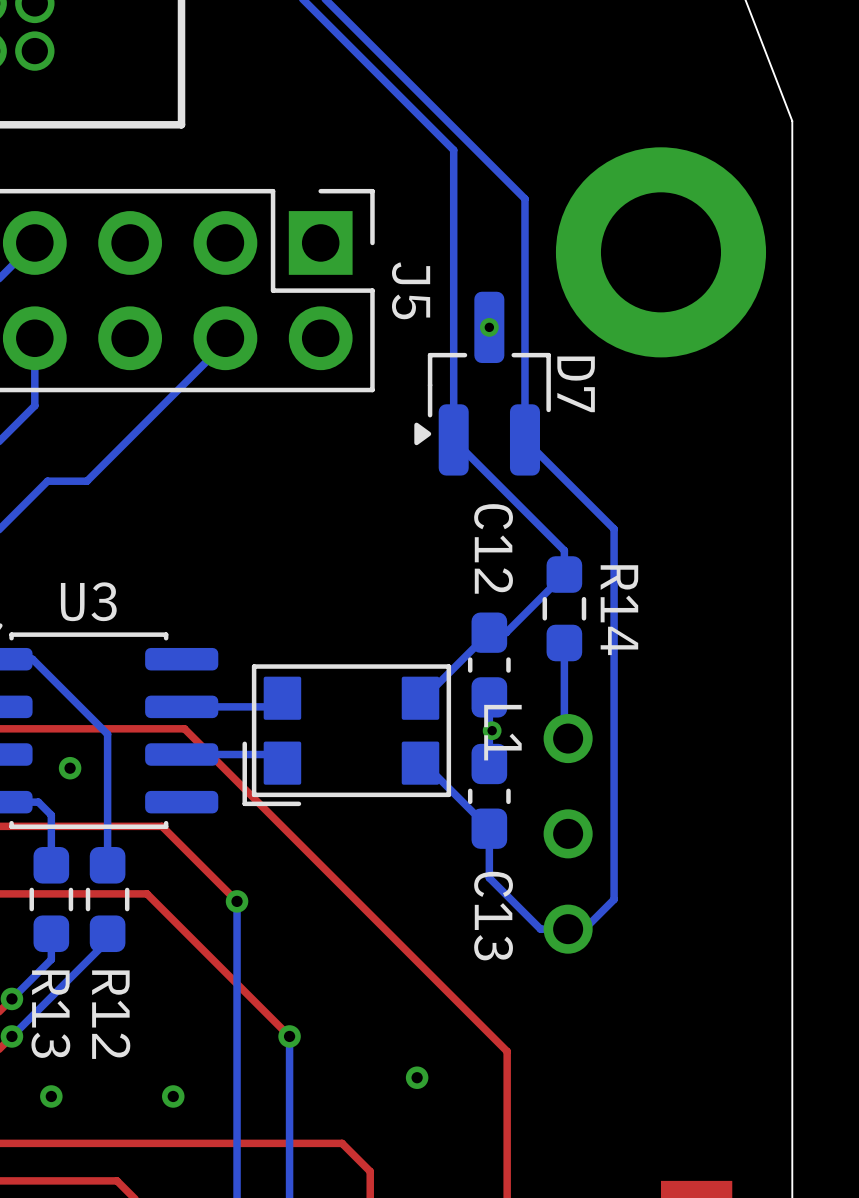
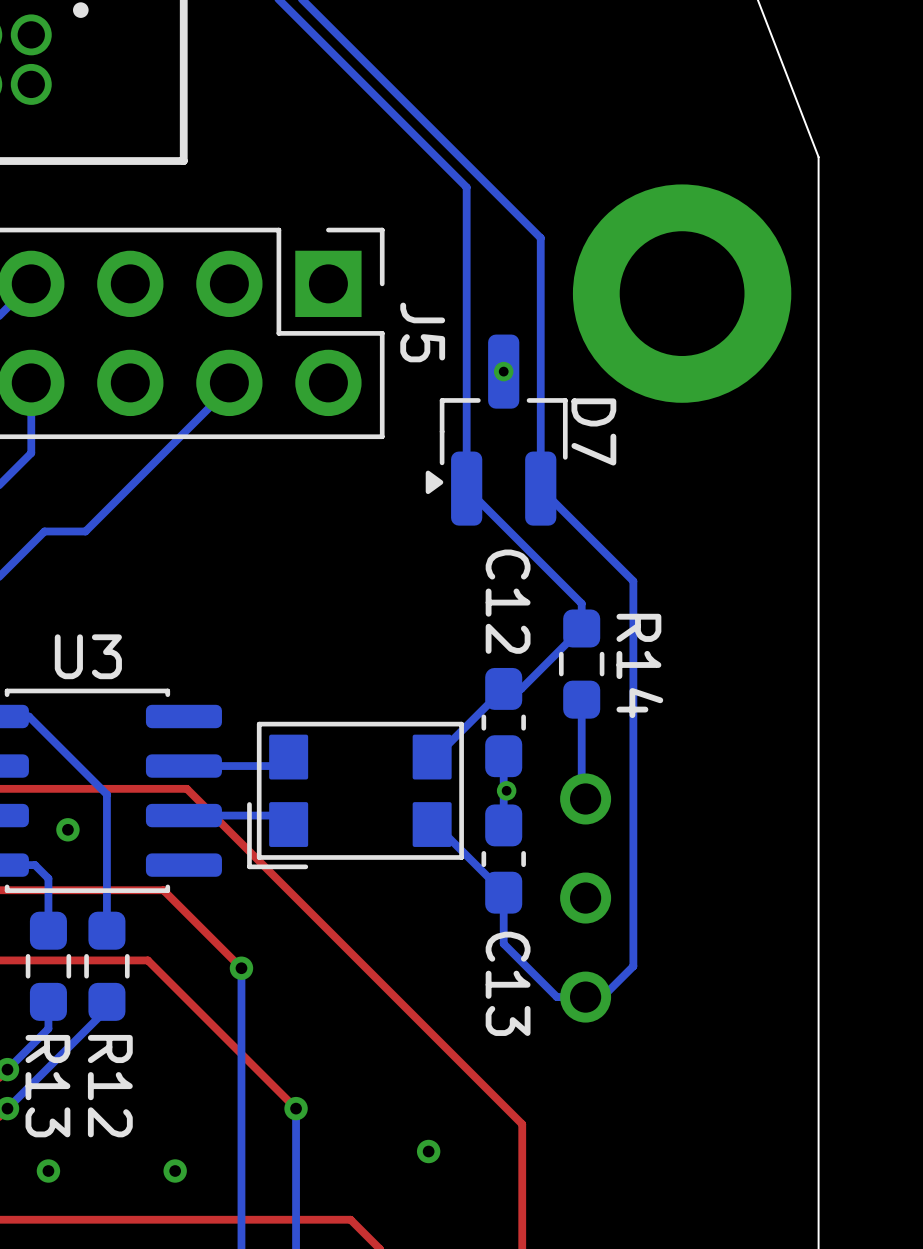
L1 name: L1 (502, 732) -> none

